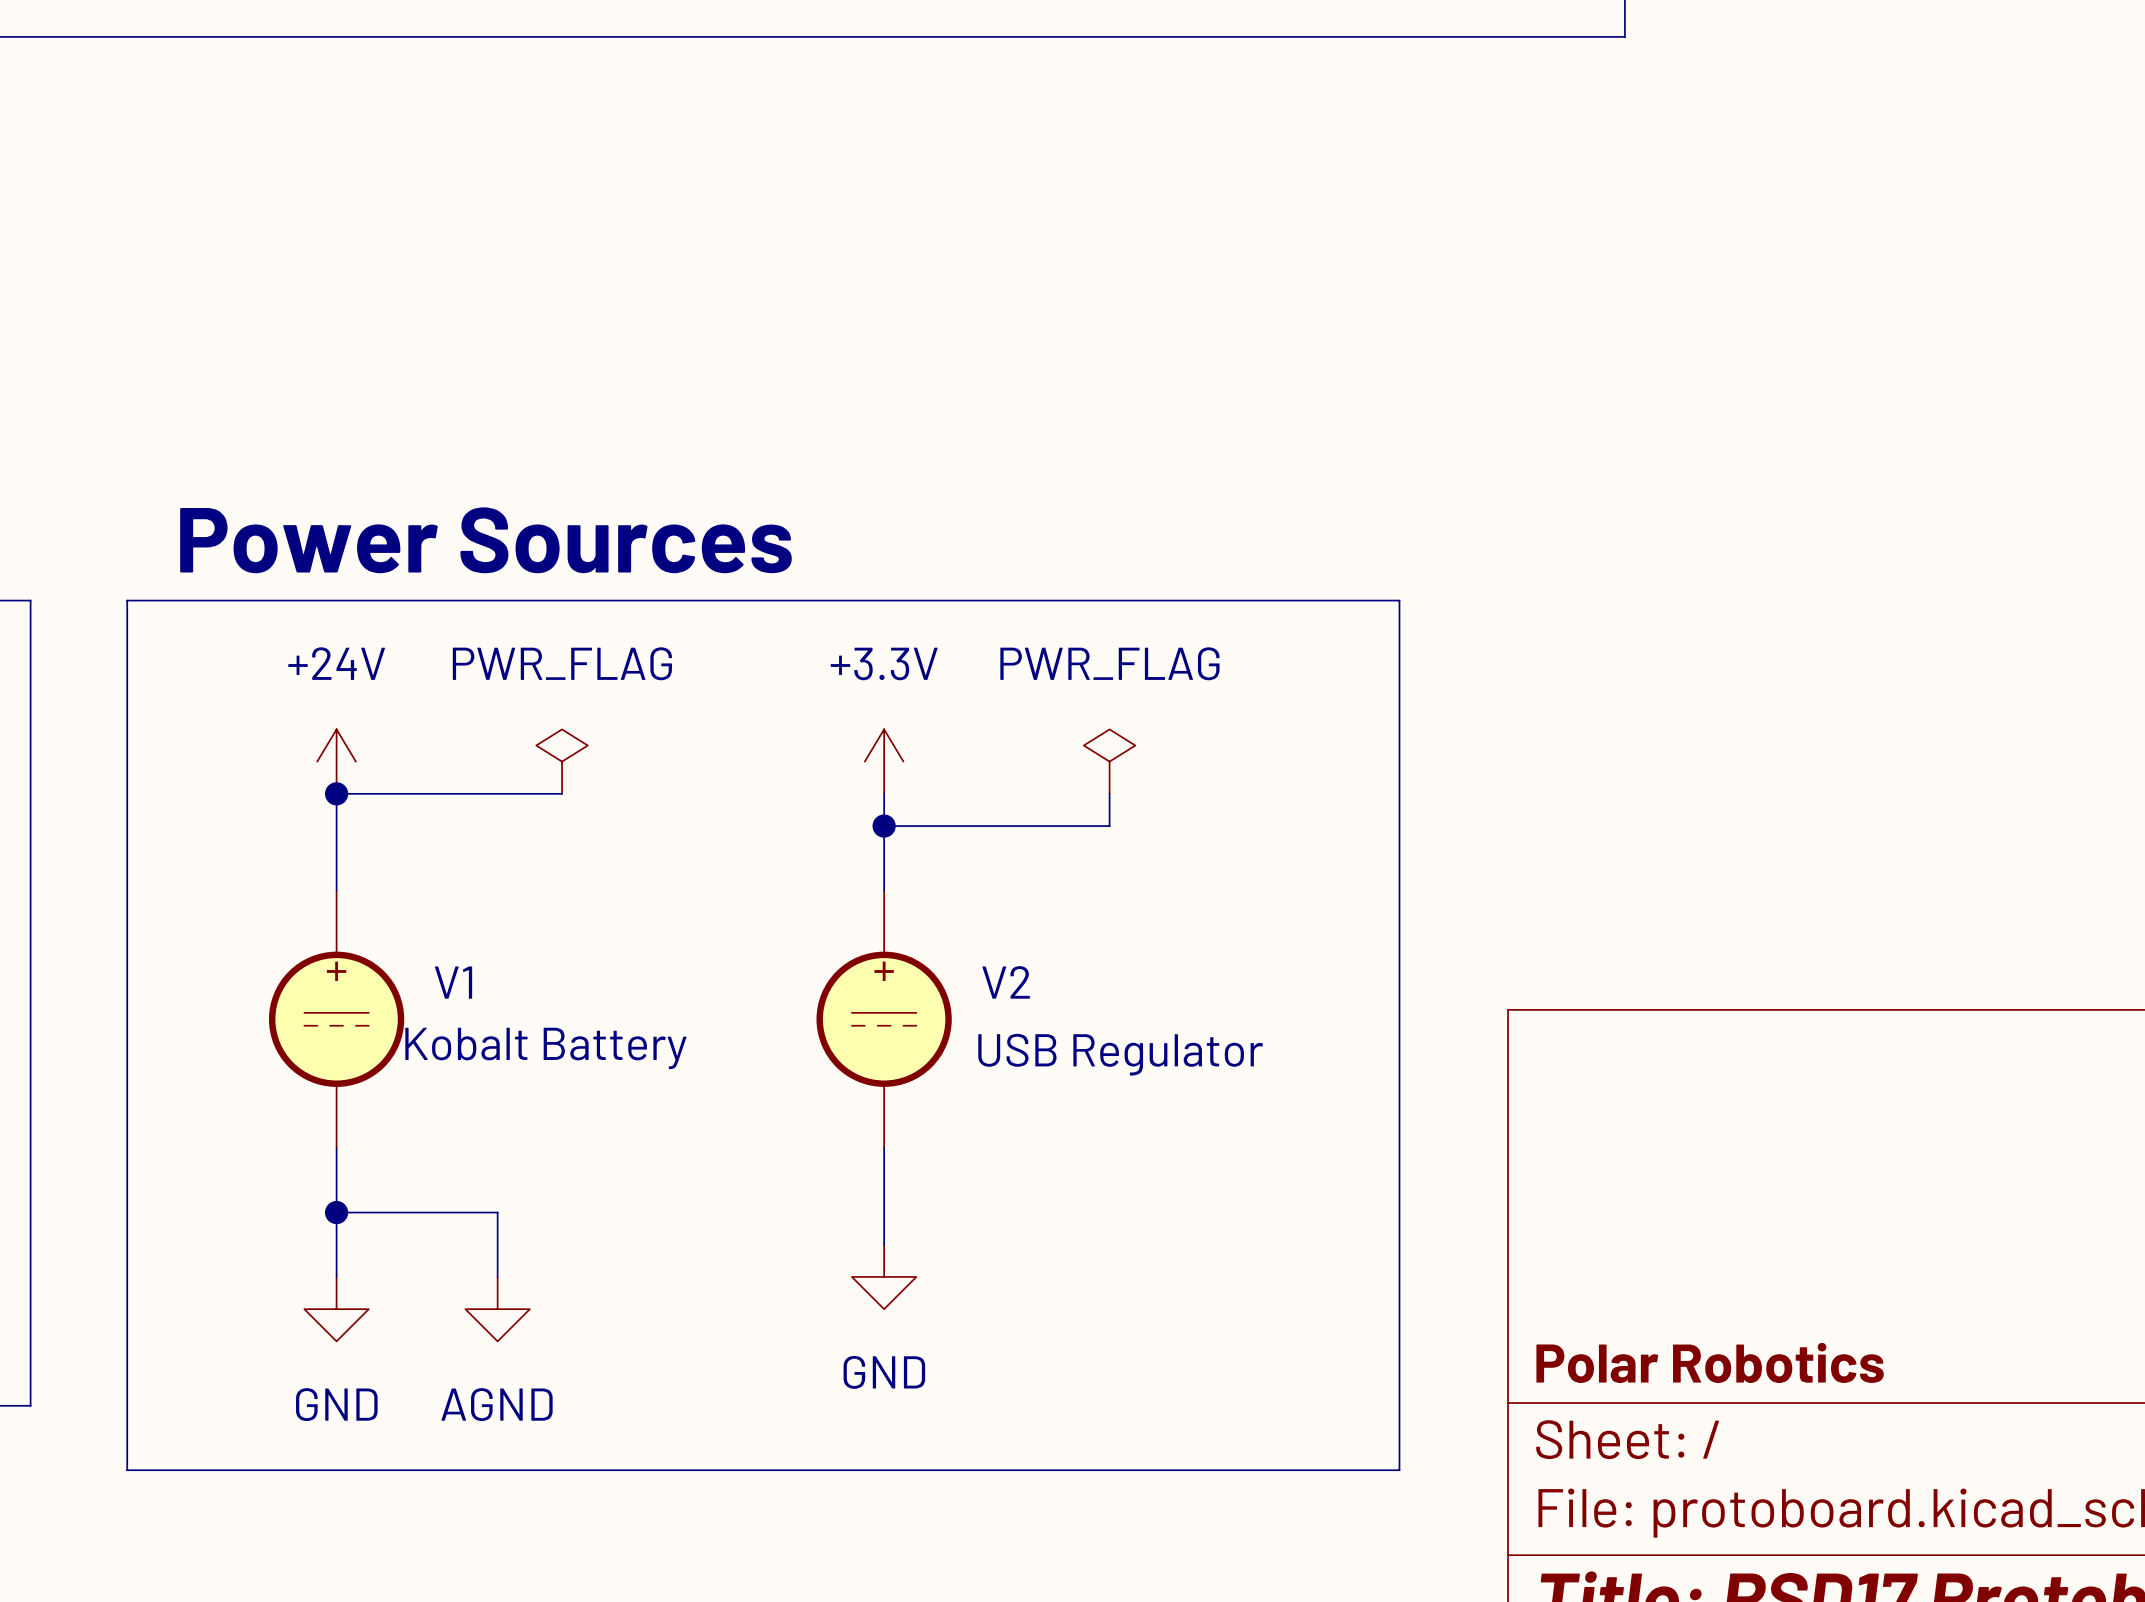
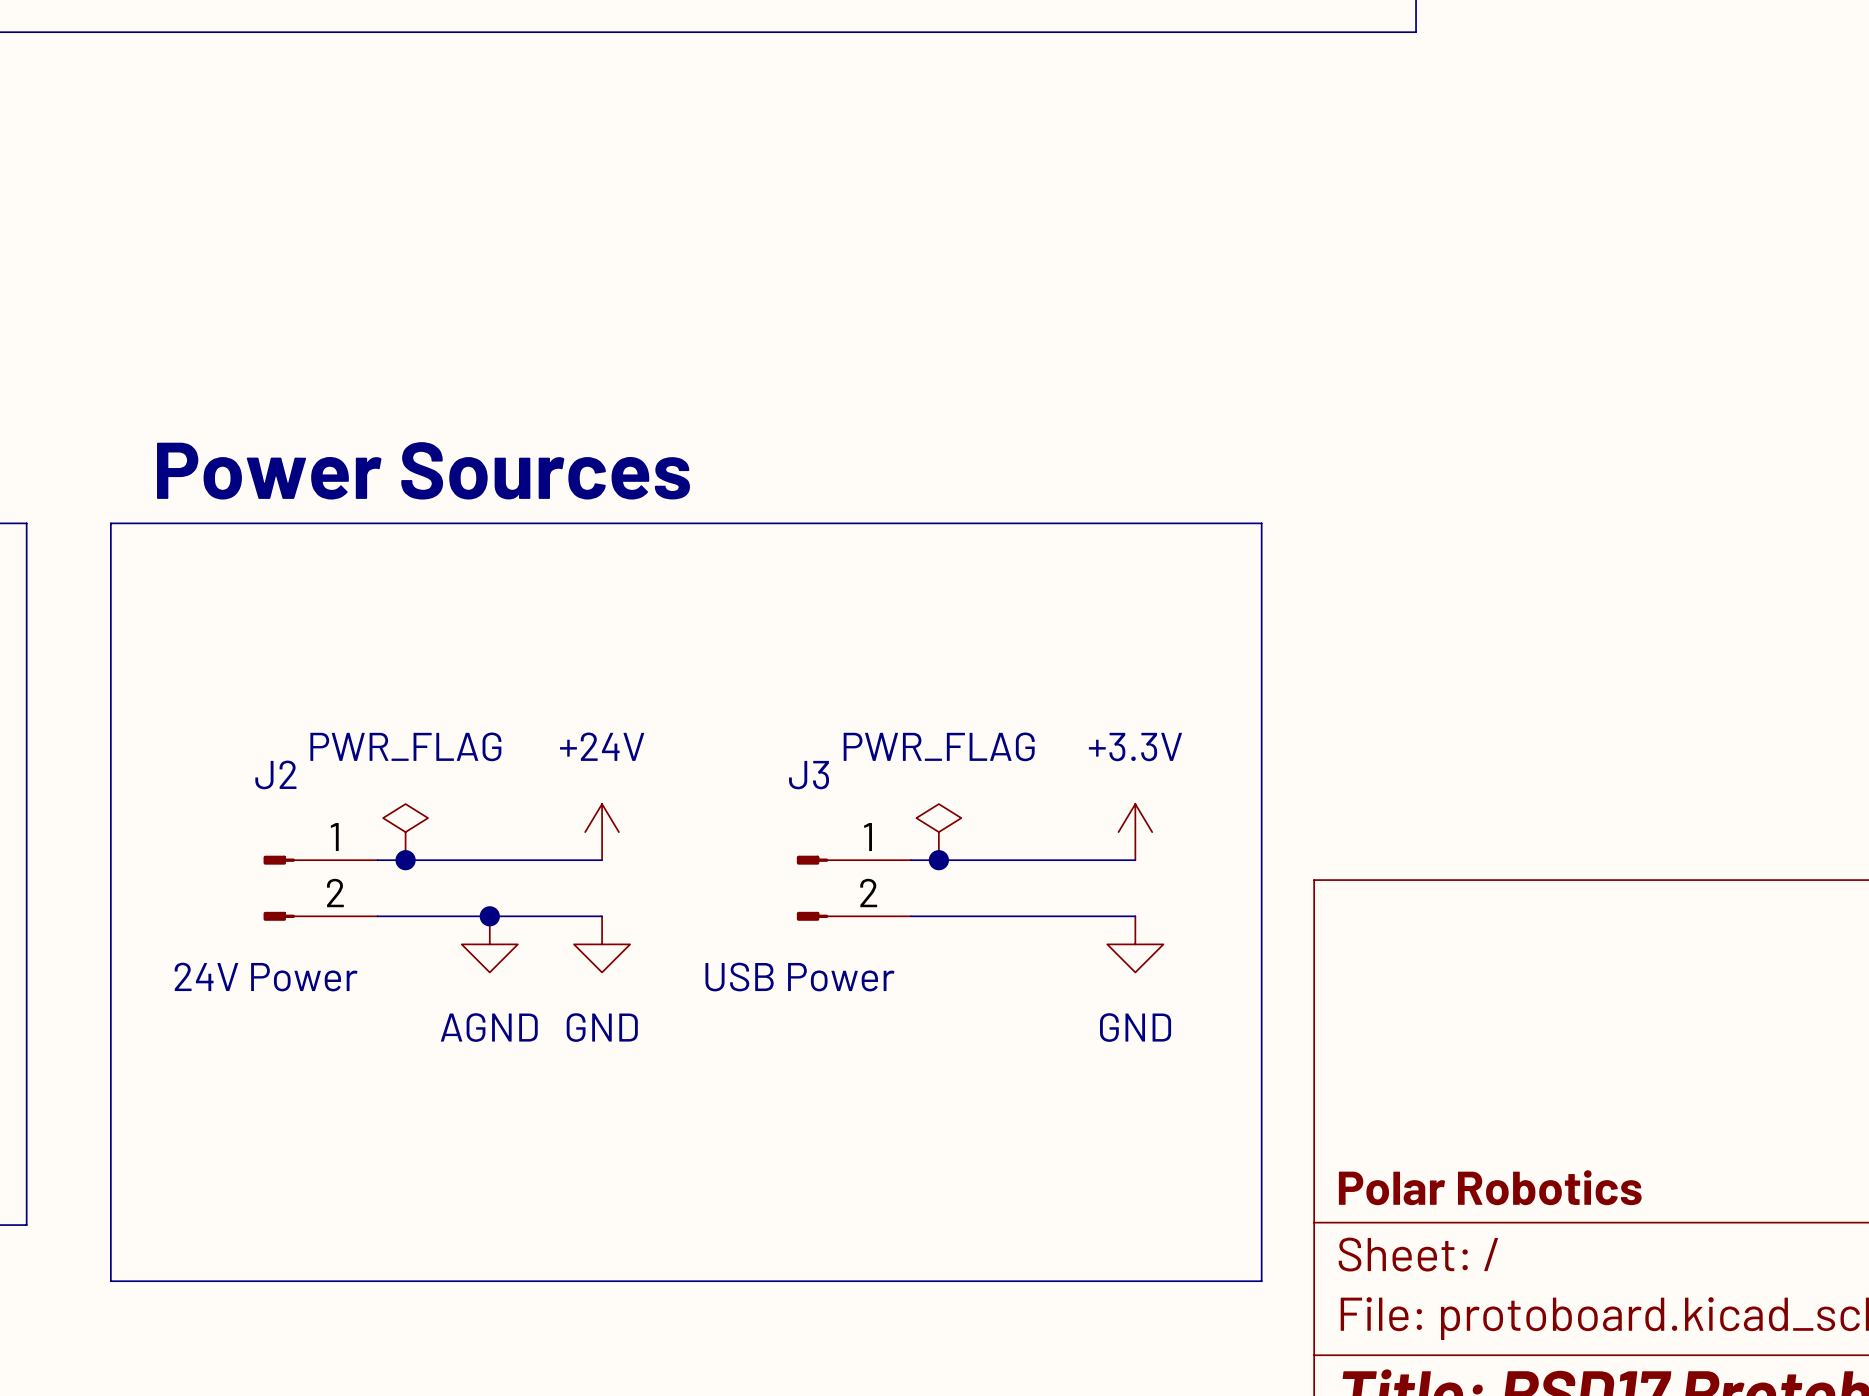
line: (1399, 600) (1399, 1470) -> (1219, 523) (1261, 523) (1261, 1281) (1219, 1281)
power symbol position: +24V (336, 761) -> +24V (602, 832)
power symbol position: PWR_FLAG (562, 761) -> PWR_FLAG (405, 832)
power symbol position: +3.3V (884, 761) -> +3.3V (1135, 832)
power symbol position: PWR_FLAG (1109, 761) -> PWR_FLAG (938, 832)
junction: (336, 793) -> none
wire: (562, 793) (336, 793) (336, 890) -> none
wire: (884, 793) (884, 890) -> none
wire: (1109, 793) (1109, 826) (884, 826) -> none
junction: (884, 826) -> none
wire: none -> (377, 860) (602, 860)
junction: none -> (405, 860)
wire: none -> (910, 860) (1135, 860)
junction: none -> (938, 860)
V1: Kobalt Battery (336, 1019) -> none
J2: none -> 24V Power (320, 888)
V2: USB Regulator (884, 1019) -> none
J3: none -> USB Power (853, 888)
wire: none -> (377, 916) (602, 916)
junction: none -> (489, 916)
wire: none -> (910, 916) (1135, 916)
power symbol: none -> GND (602, 944)
power symbol: none -> GND (1135, 944)
wire: (336, 1148) (336, 1276) -> none
wire: (884, 1148) (884, 1244) -> none
wire: (336, 1212) (497, 1212) (497, 1276) -> none
junction: (336, 1212) -> none
power symbol: GND (884, 1276) -> none
power symbol: GND (336, 1309) -> none
power symbol position: AGND (497, 1309) -> AGND (489, 944)

